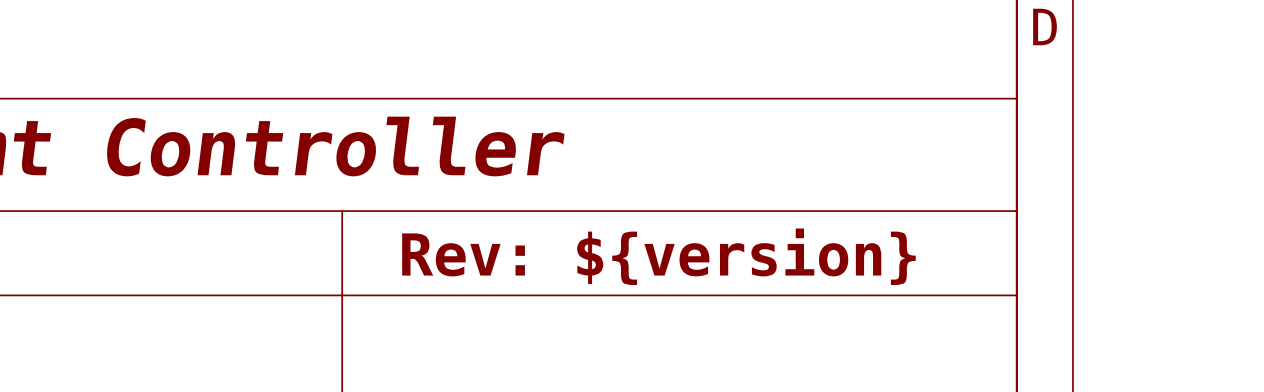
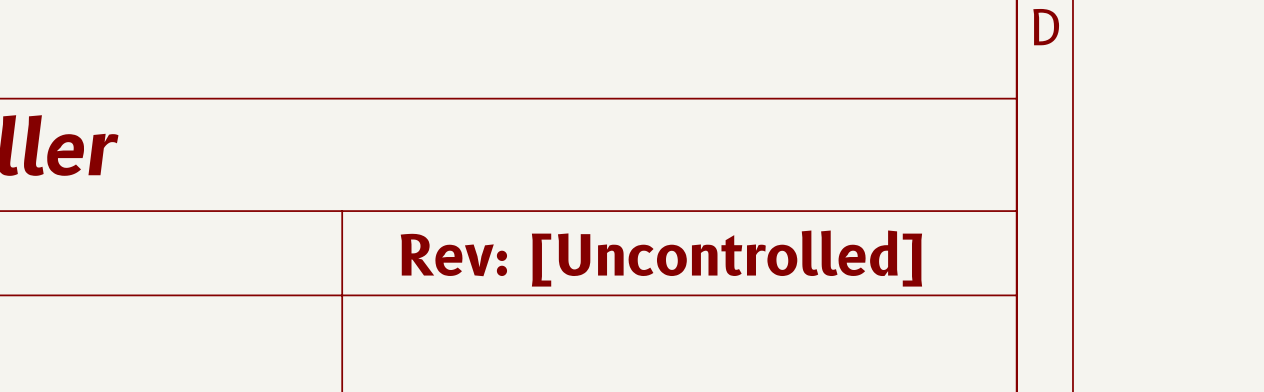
title block: Rev: ${version} (658, 256) -> Rev: [Uncontrolled] (661, 258)

